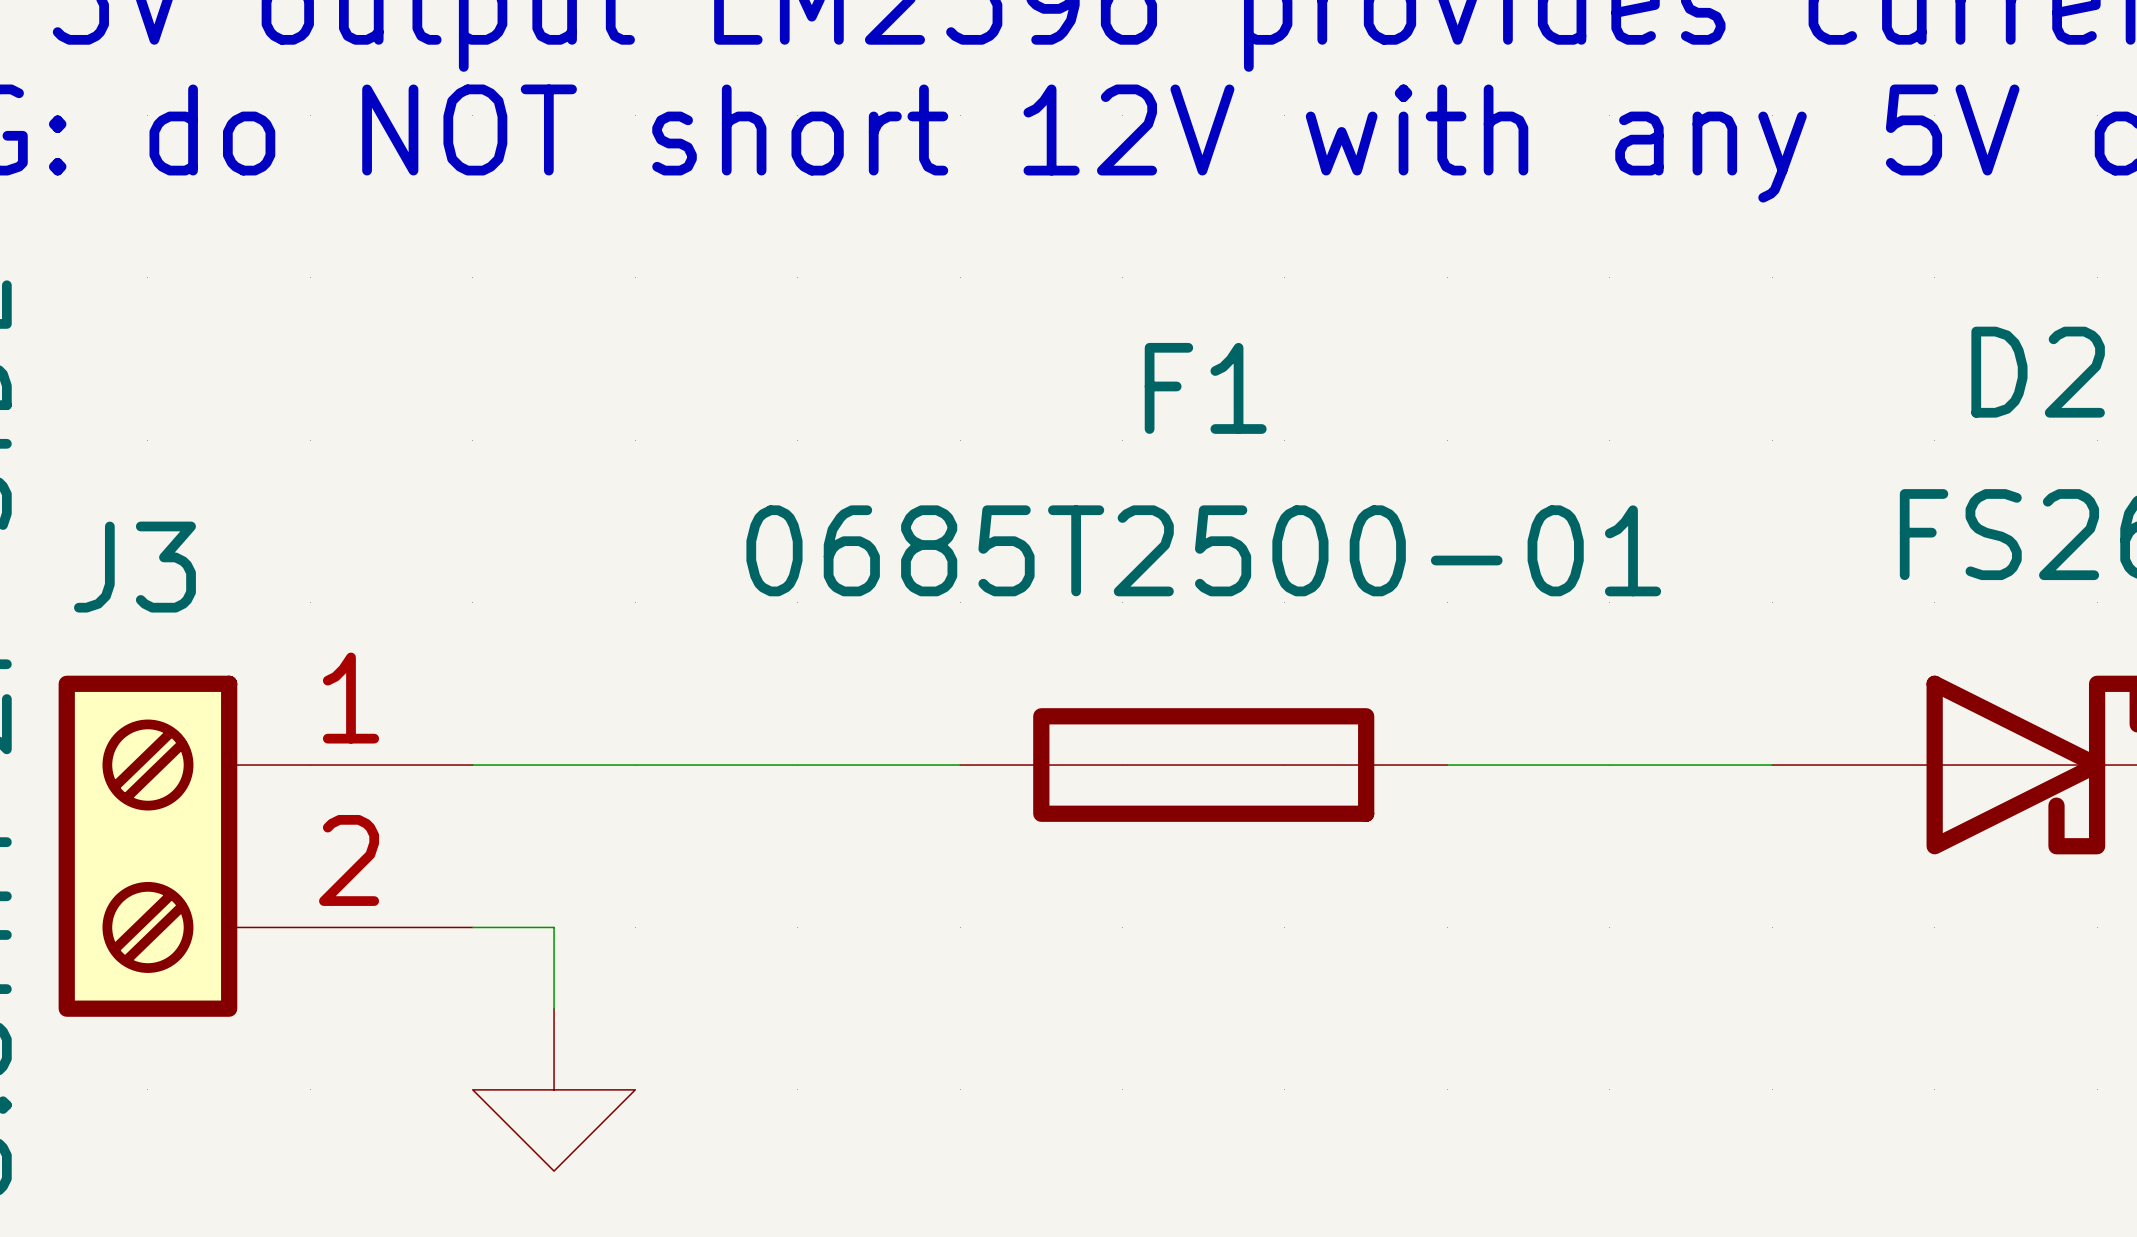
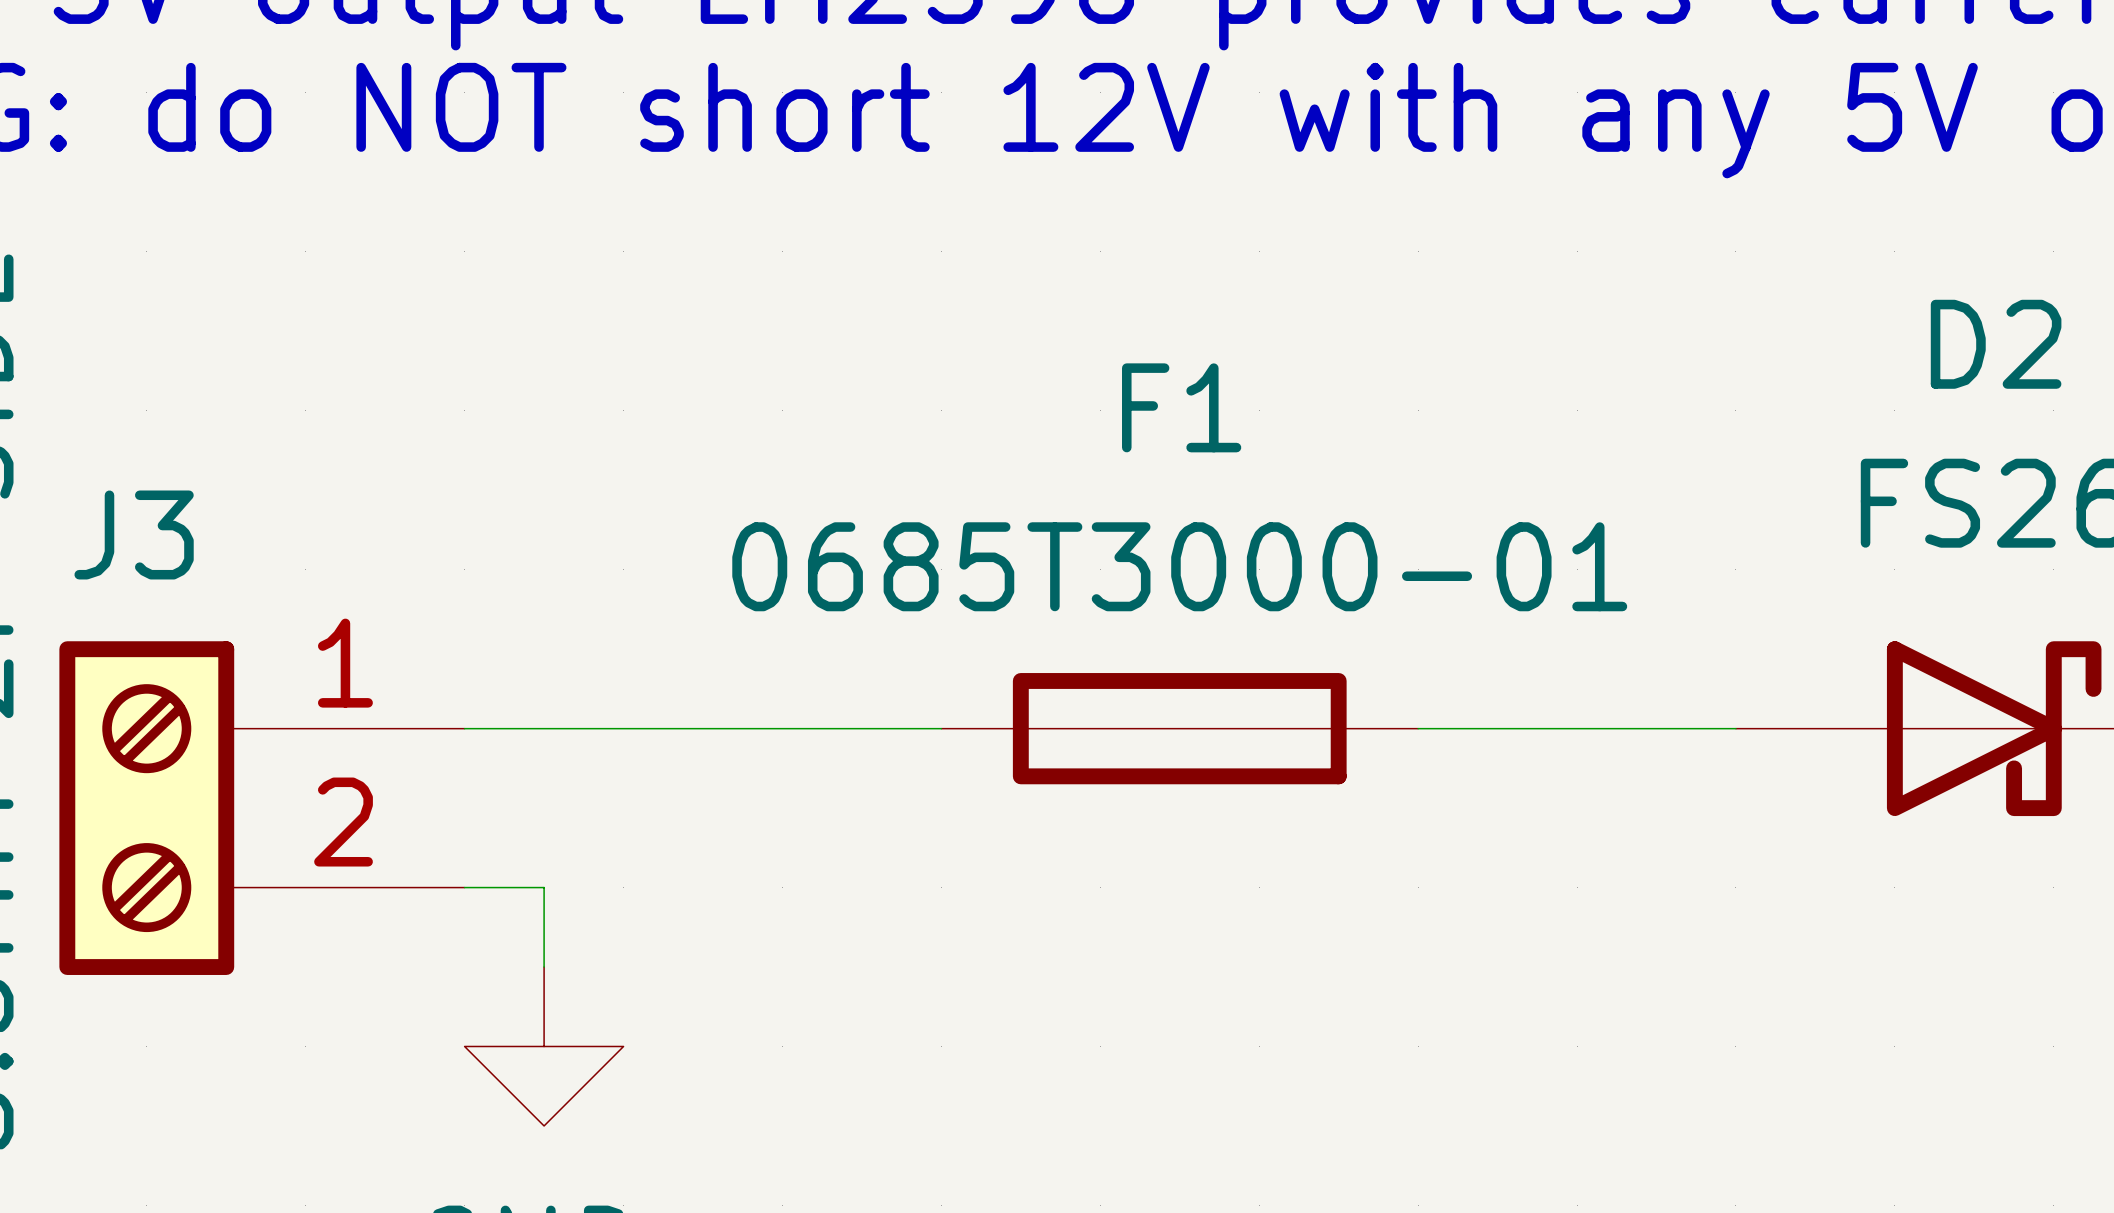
F1 name position: F1 (1205, 388) -> F1 (1181, 407)
F1 value: 0685T2500-01 (1203, 550) -> 0685T3000-01 (1179, 566)

